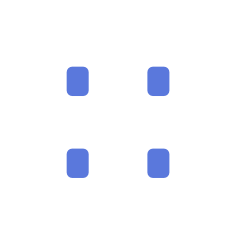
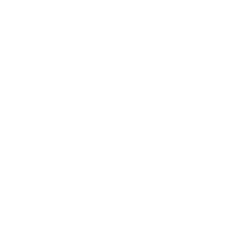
part: (118, 81) -> none
part: (118, 163) -> none

